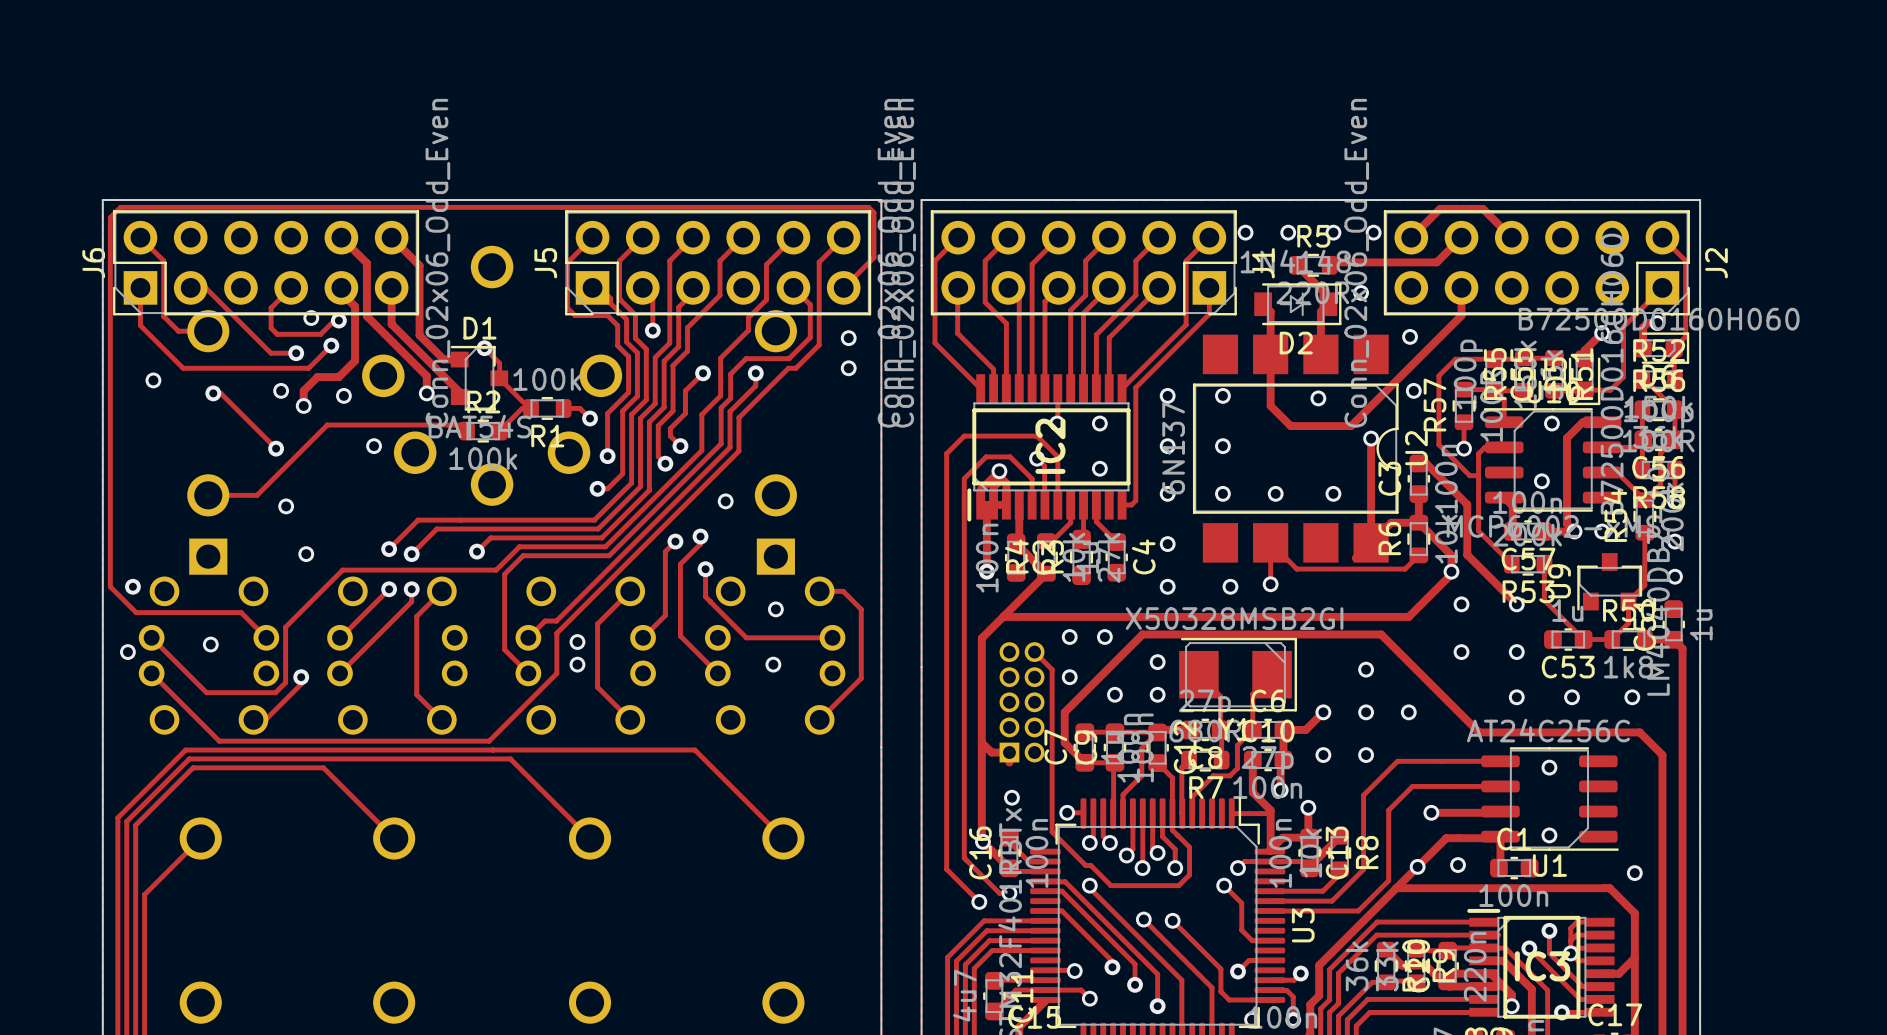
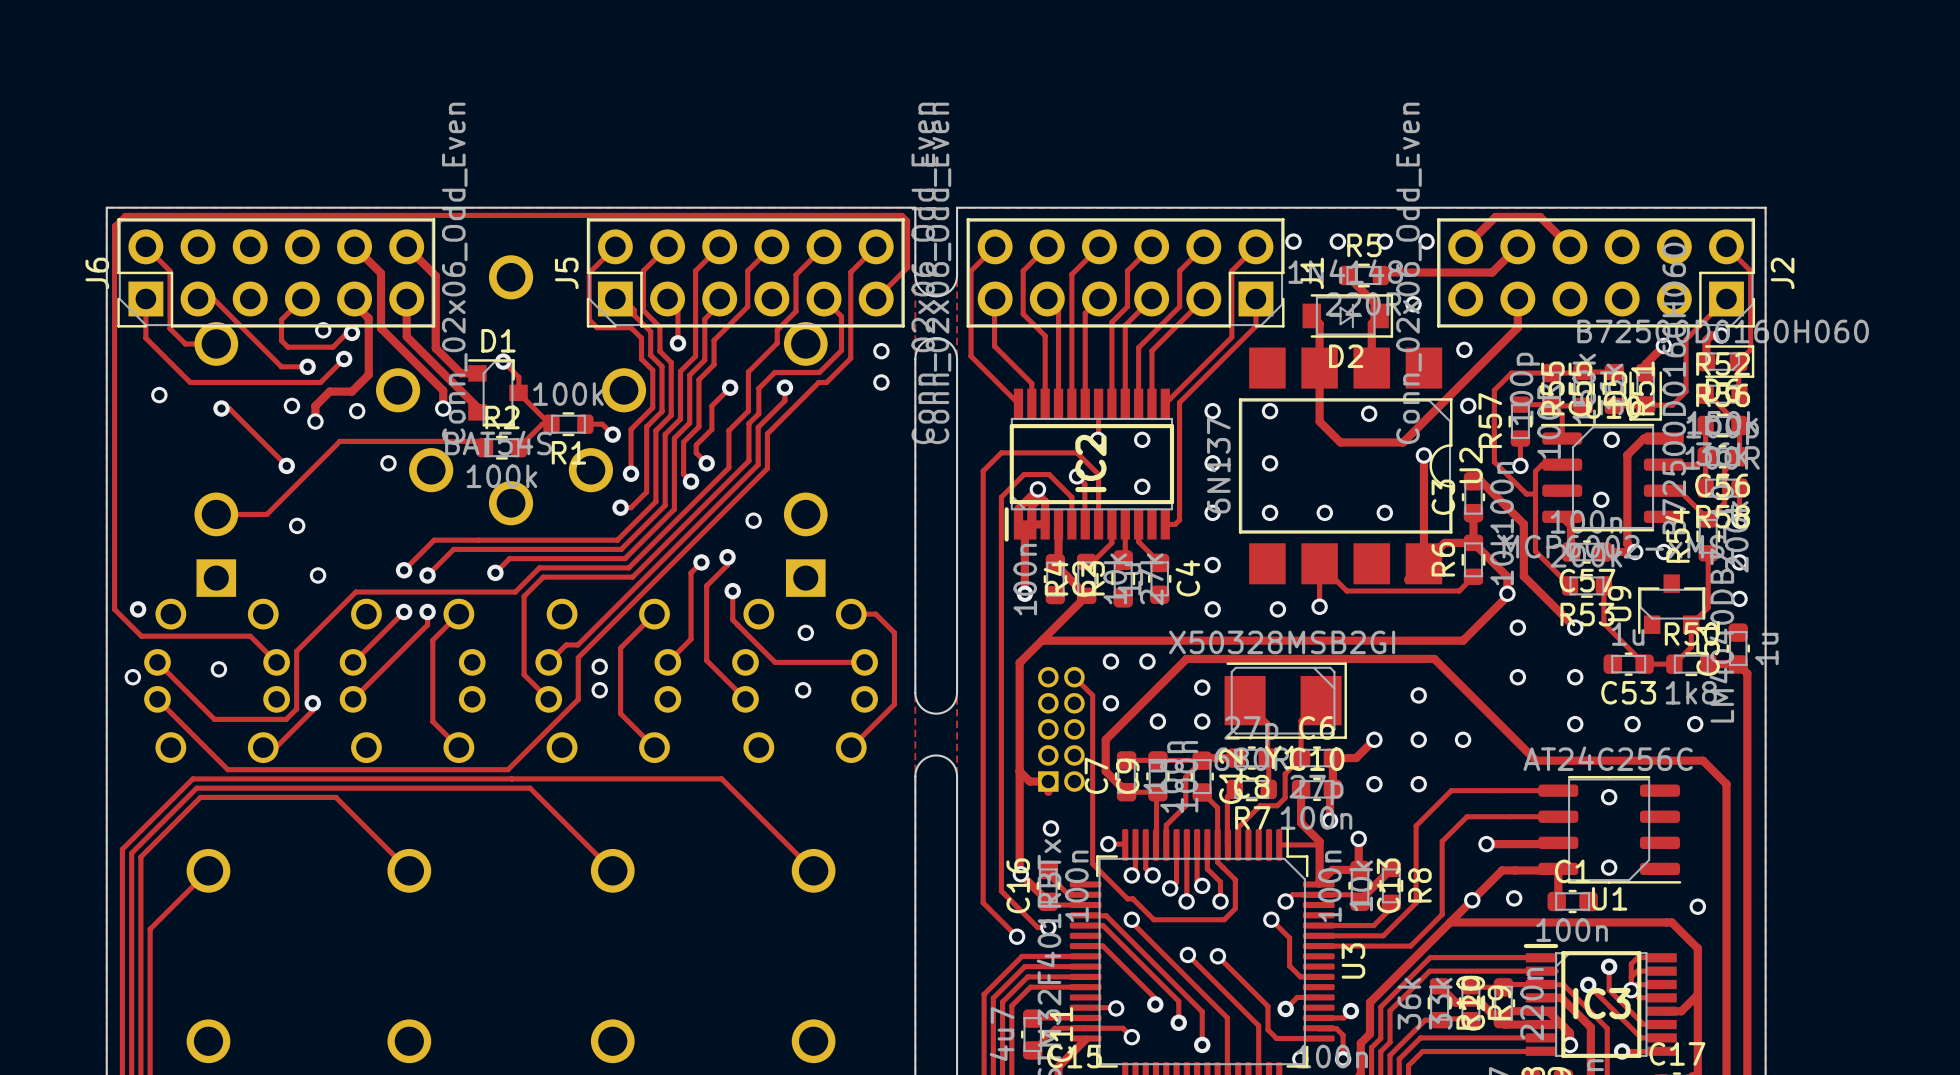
board edge: (881, 265) (881, 345) -> (915, 275) (916, 283) (921, 290) (928, 294) (936, 296) (944, 294) (950, 290) (955, 283) (957, 275)
board edge: (921, 265) (921, 345) -> (915, 358) (916, 351) (921, 344) (928, 339) (936, 338) (944, 339) (950, 344) (955, 351) (957, 358)
board edge: (881, 667) (881, 747) -> (915, 692) (916, 700) (921, 707) (928, 712) (936, 713) (944, 712) (950, 707) (955, 700) (957, 692)
board edge: (921, 667) (921, 747) -> (915, 776) (916, 768) (921, 761) (928, 757) (936, 755) (944, 757) (950, 761) (955, 768) (957, 776)

